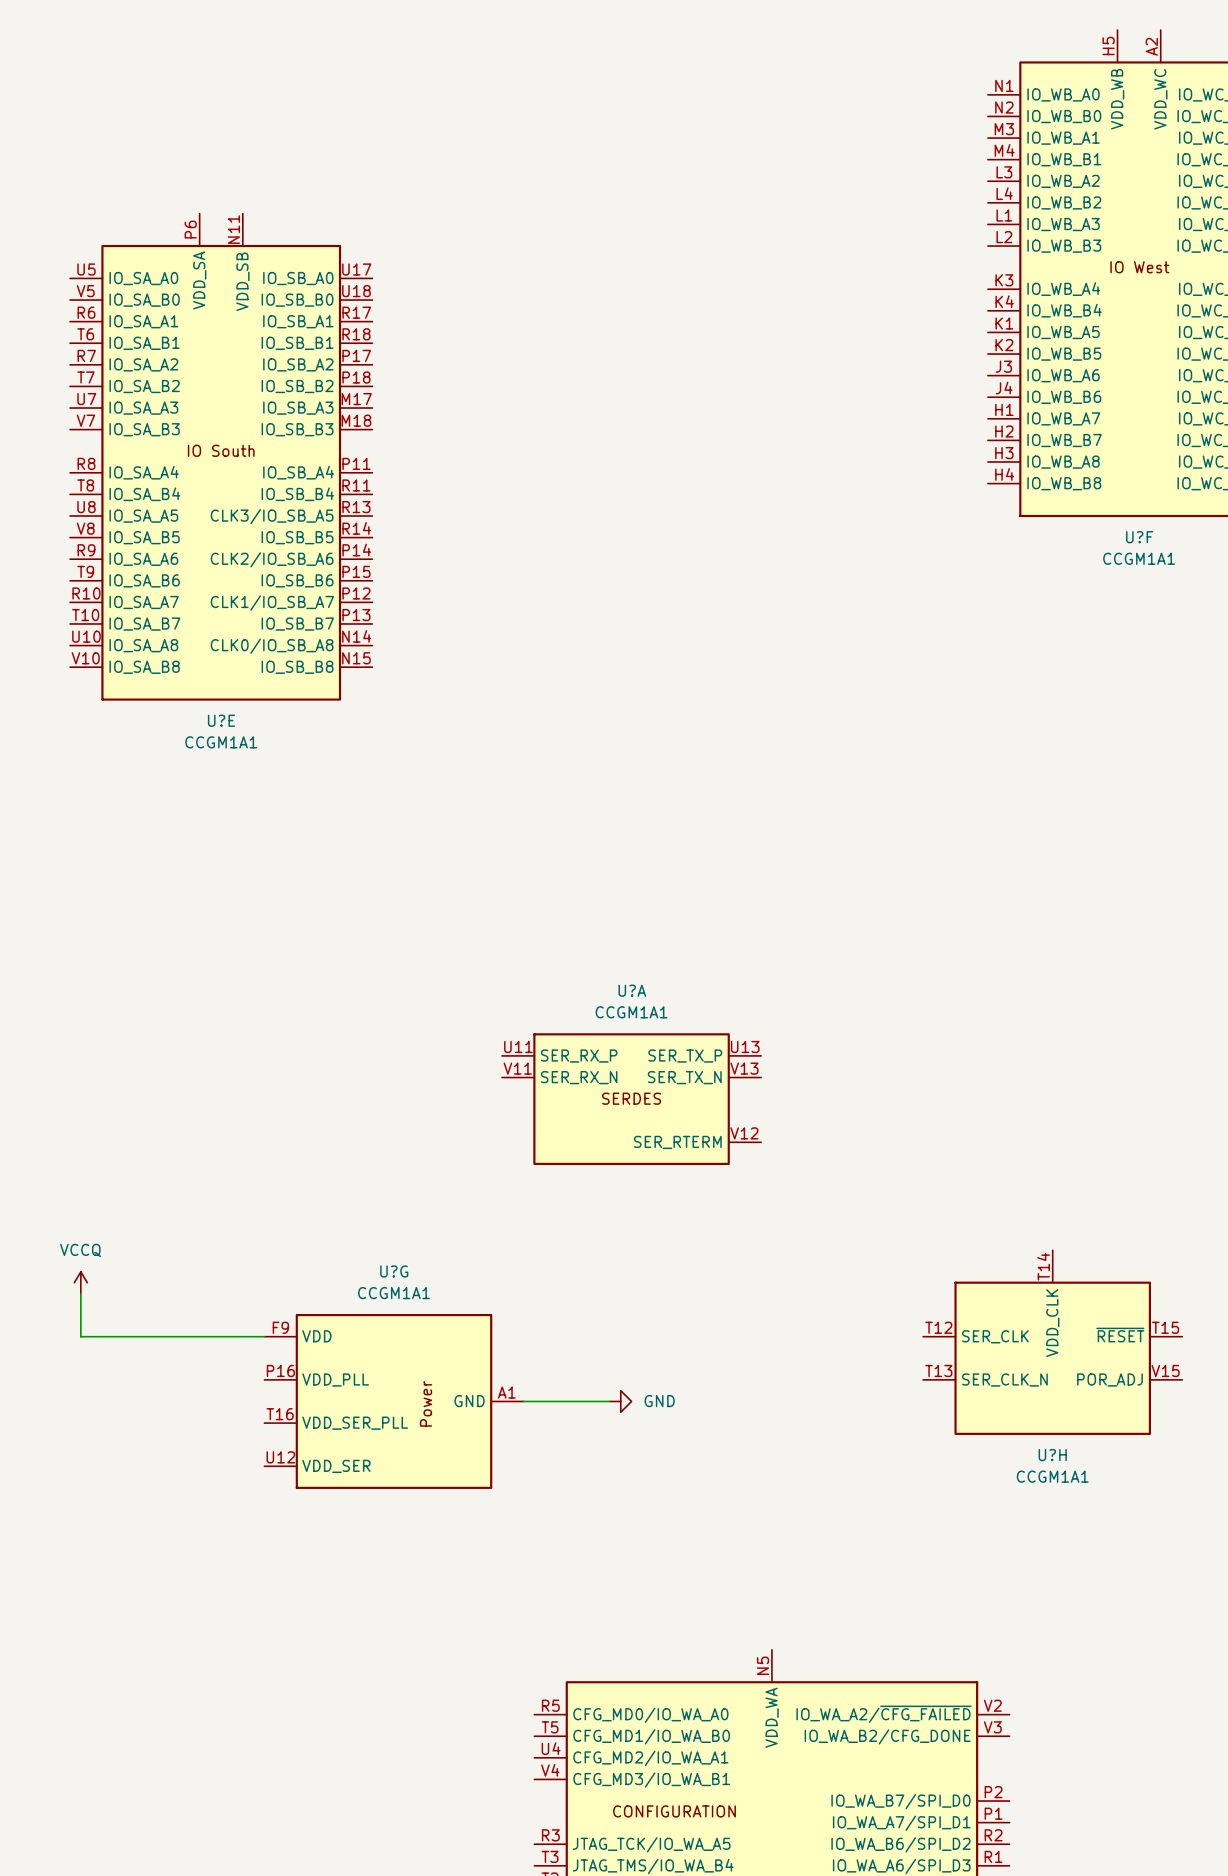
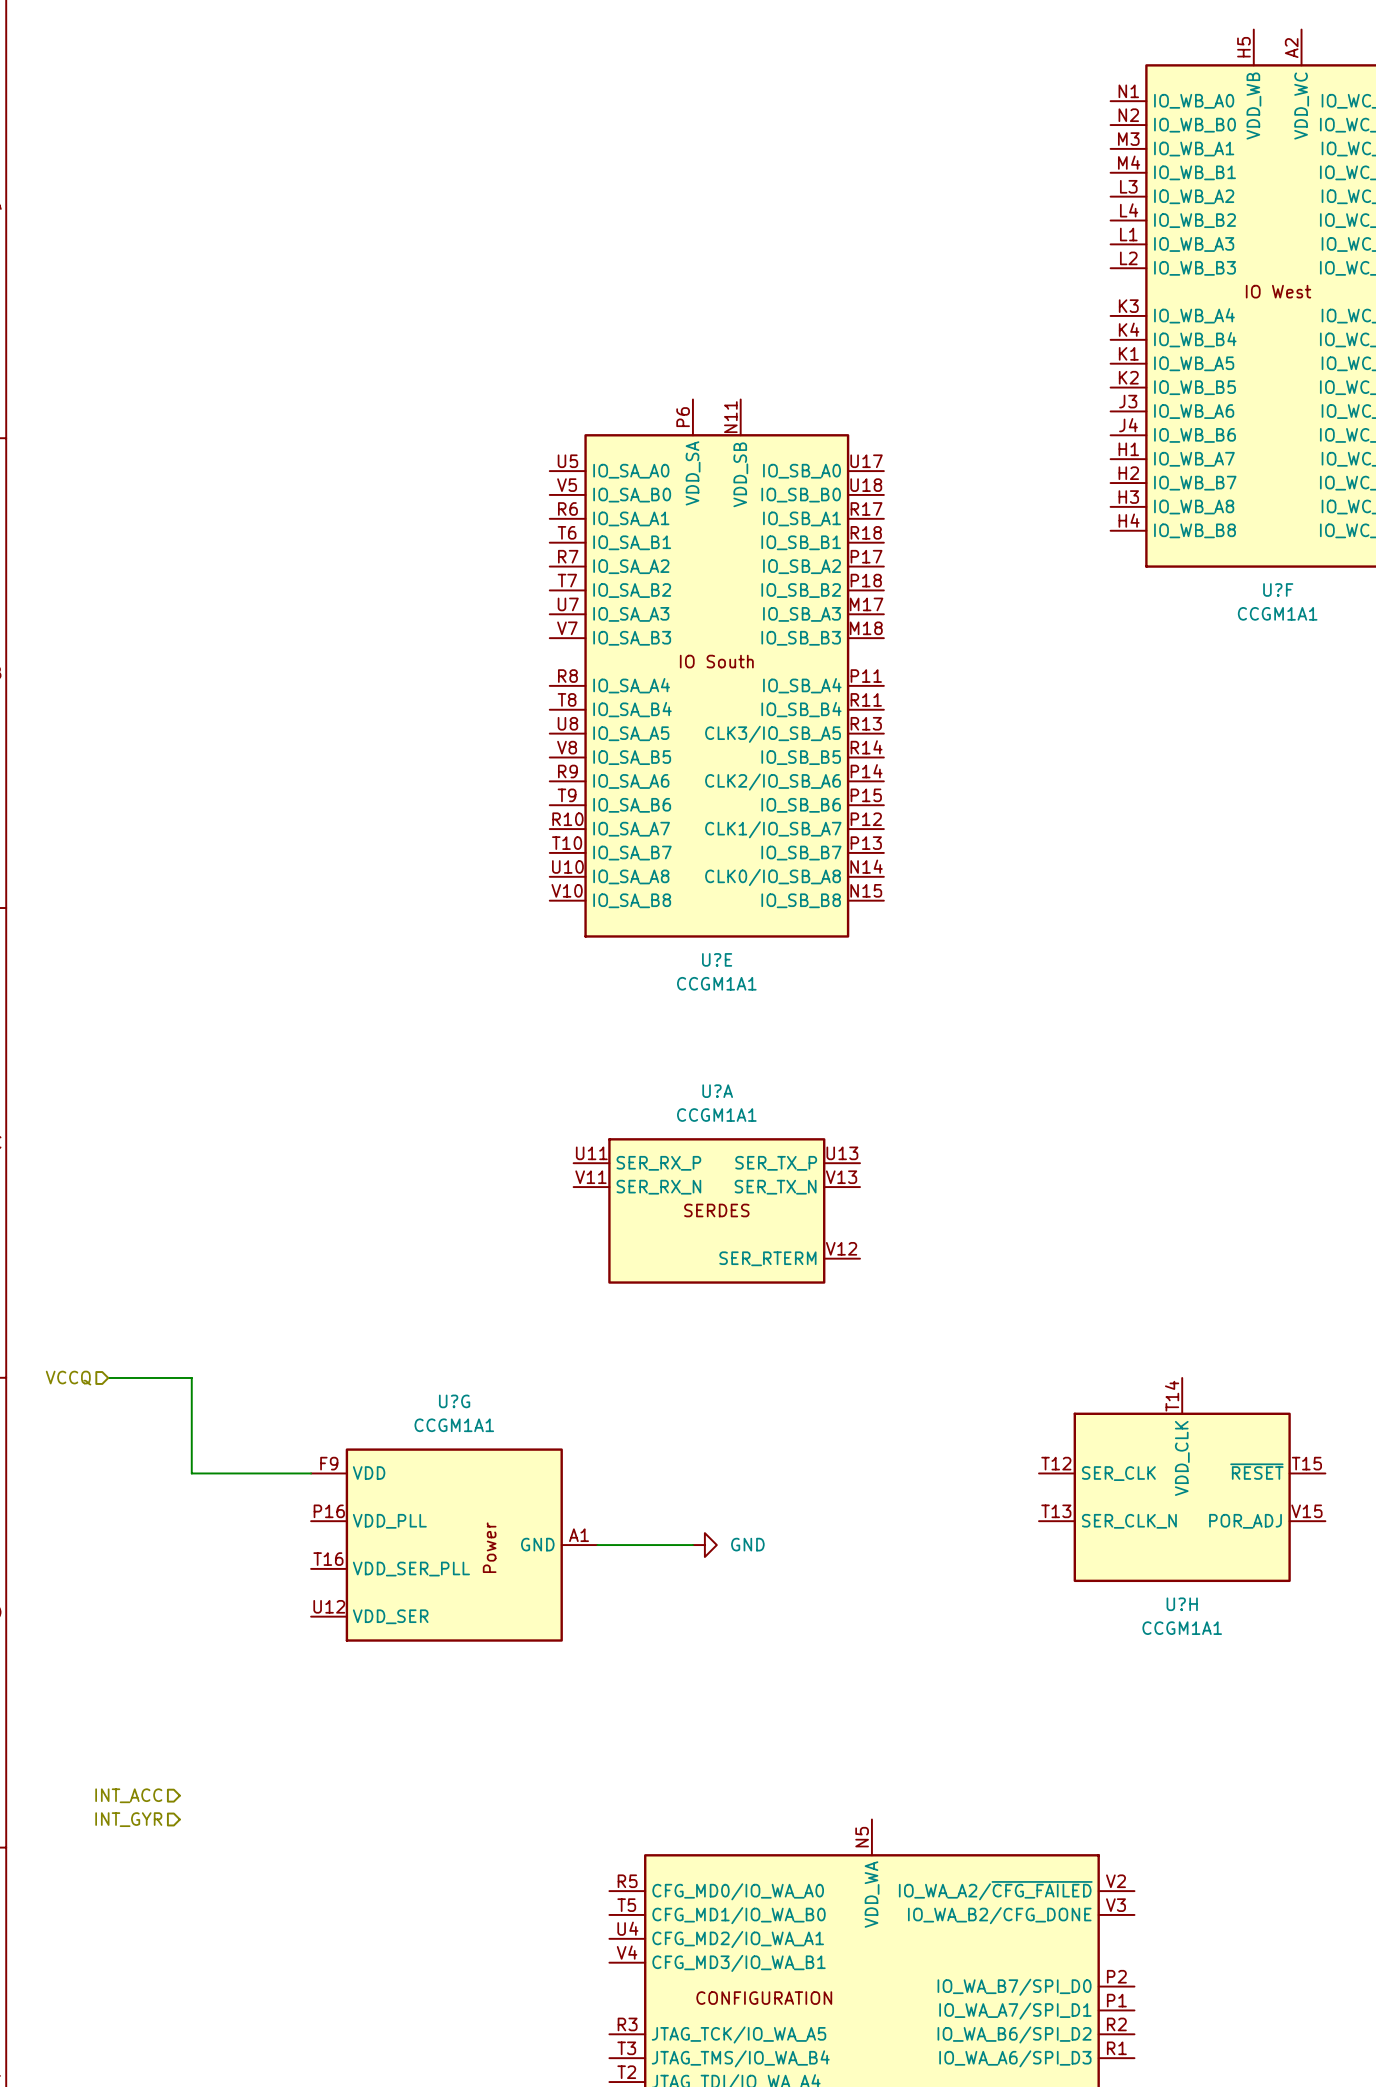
U?E: CCGM1A1 (221, 457) -> none
U?E: none -> CCGM1A1 (716, 668)
hierarchical label: none -> VCCQ (68, 1378)
power symbol: VCCQ (80, 1282) -> none
wire: (80, 1293) (80, 1336) (156, 1336) -> (108, 1377) (191, 1377) (191, 1473)
hierarchical label: none -> INT_ACC (128, 1795)
hierarchical label: none -> INT_GYR (128, 1819)

